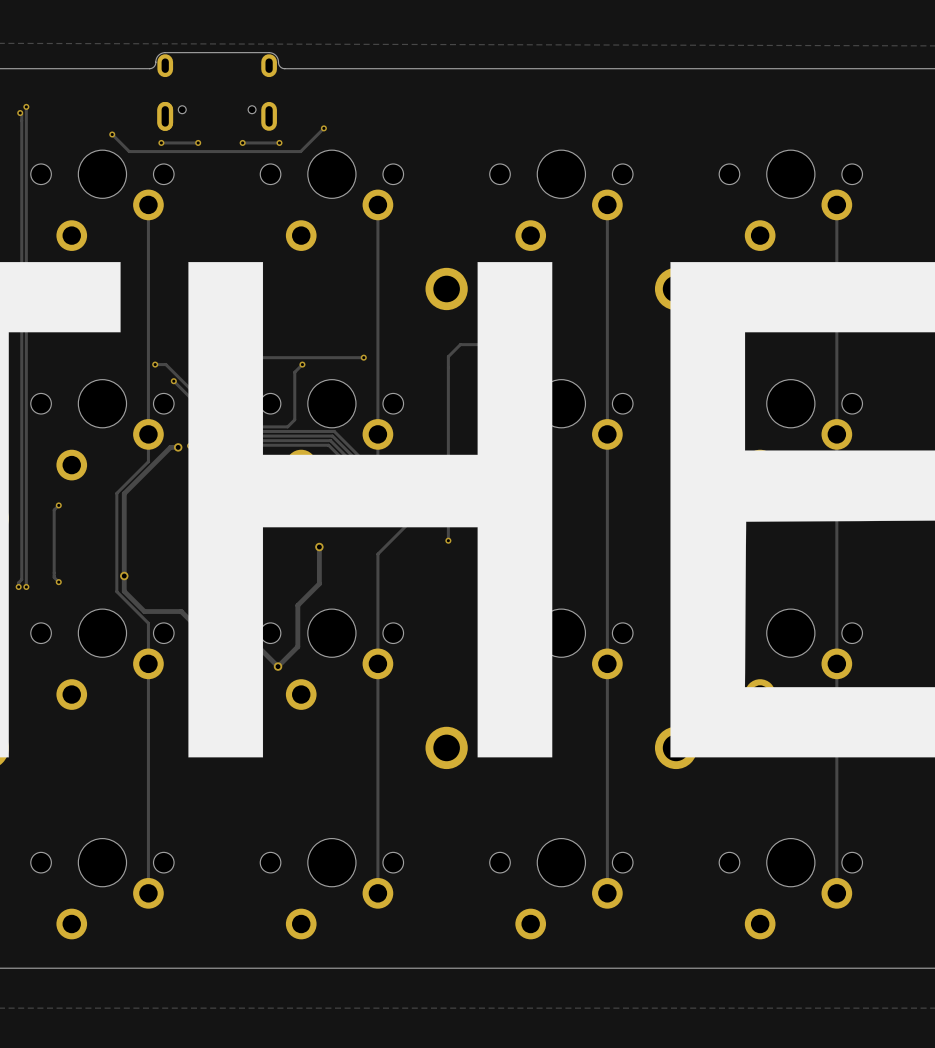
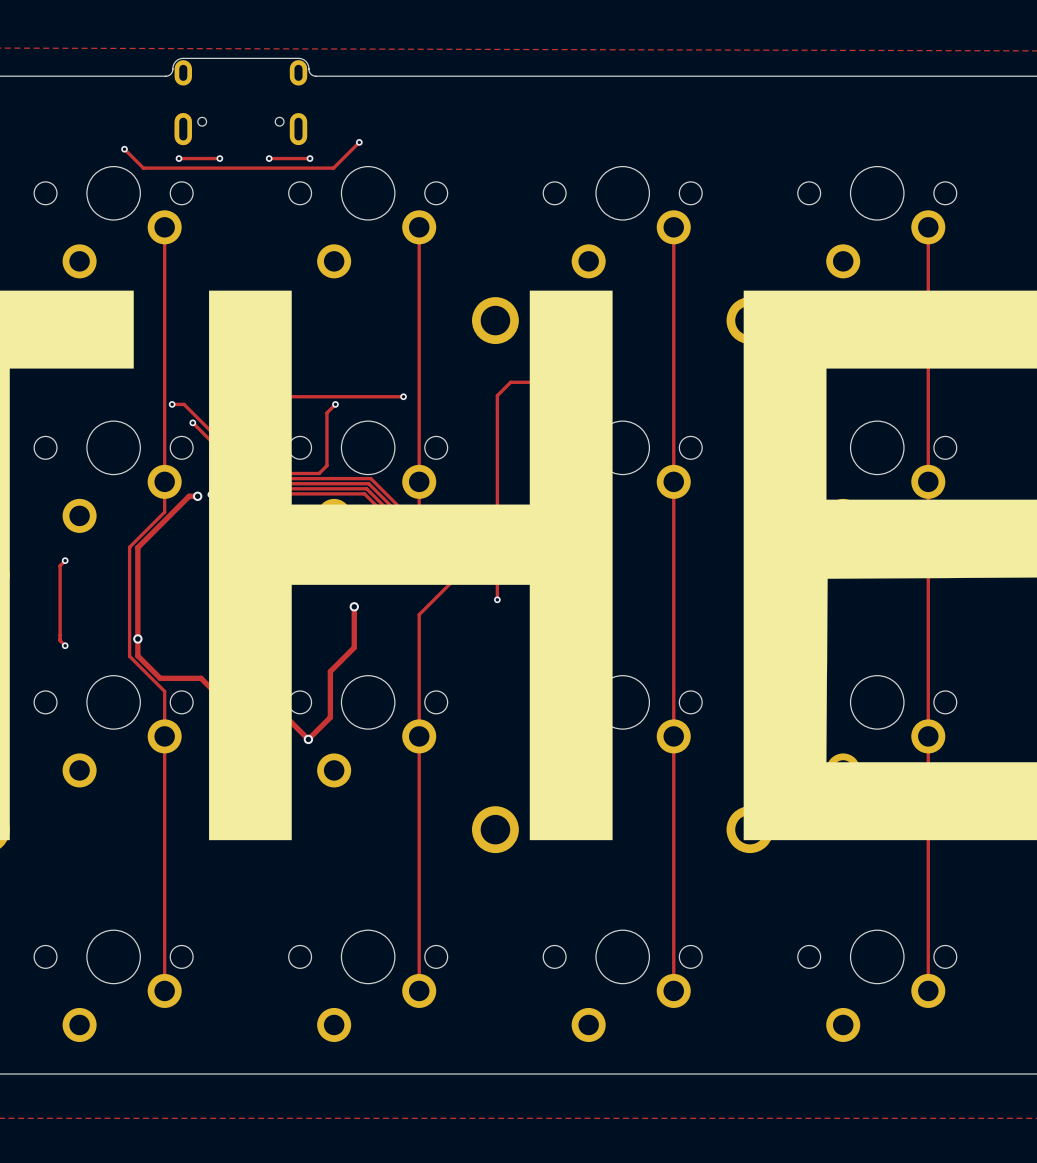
track: (26, 106) (26, 586) -> none
via: (26, 106) -> none
track: (20, 113) (21, 114) (21, 579) (18, 582) (18, 586) -> none
via: (20, 113) -> none
via: (18, 586) -> none
via: (26, 586) -> none

